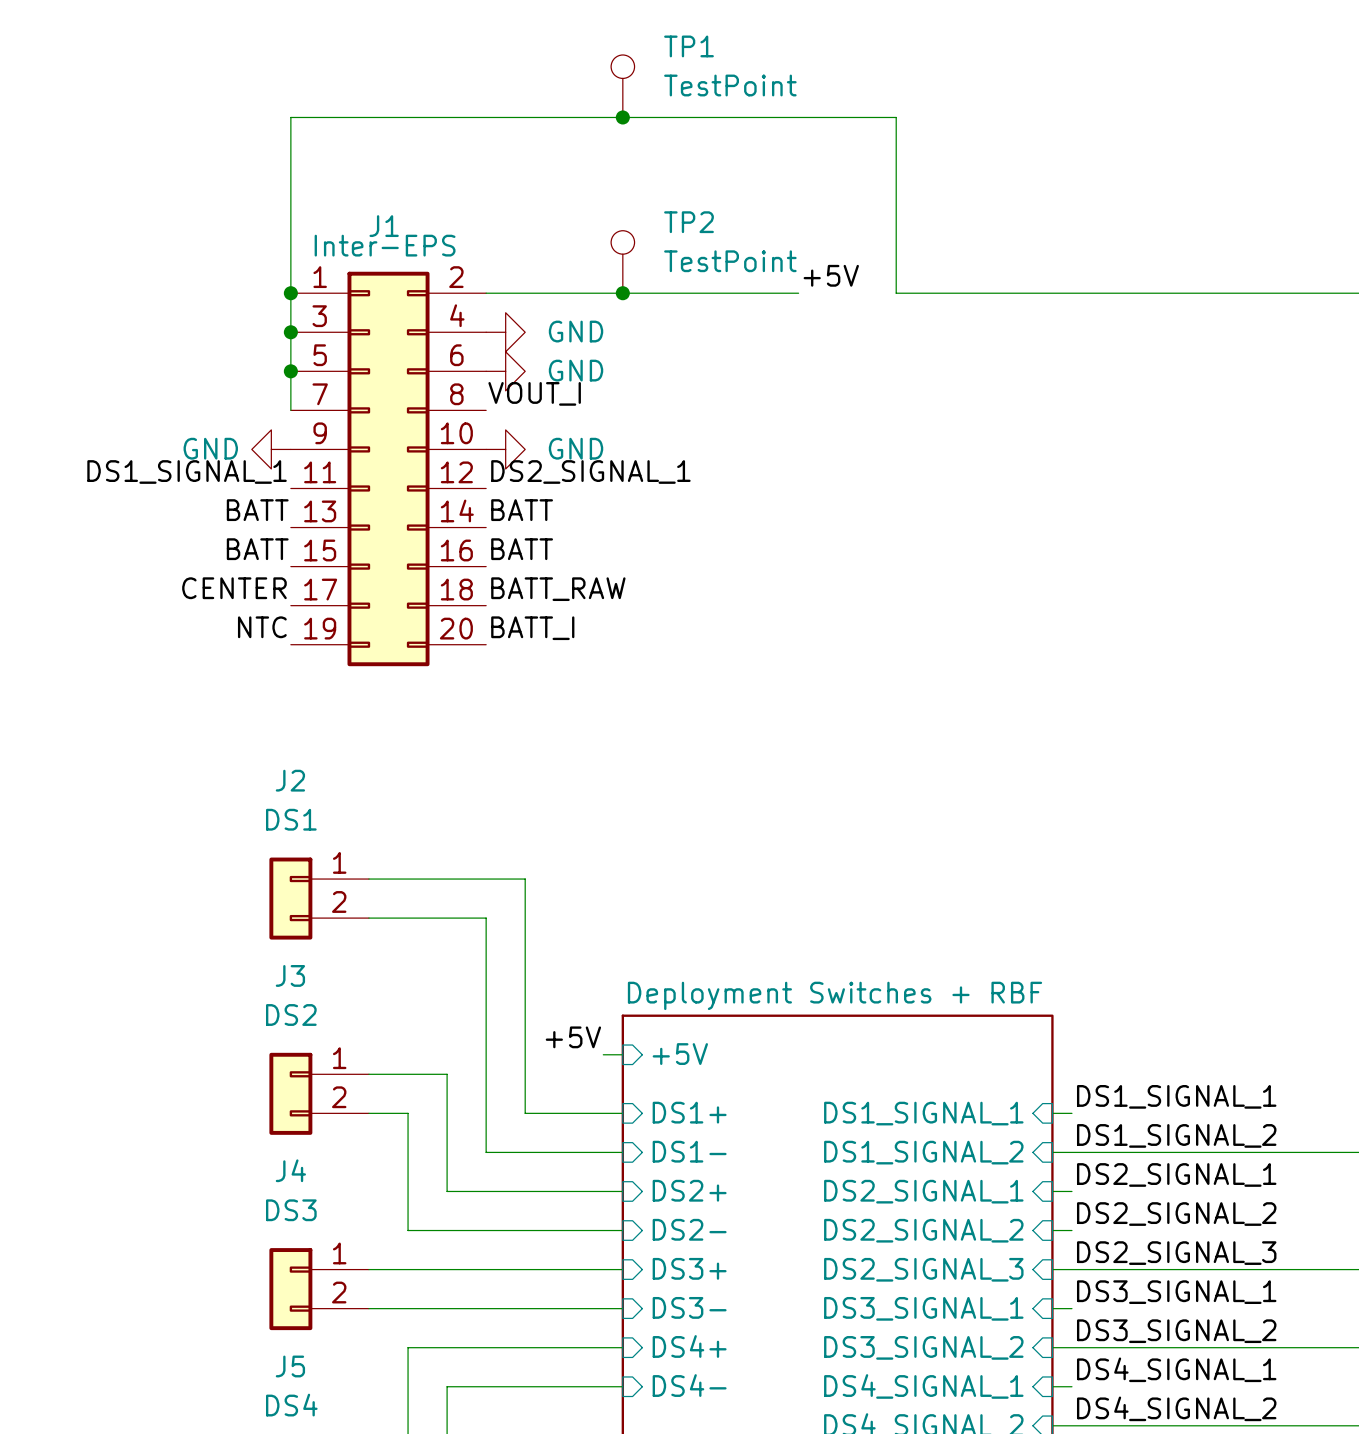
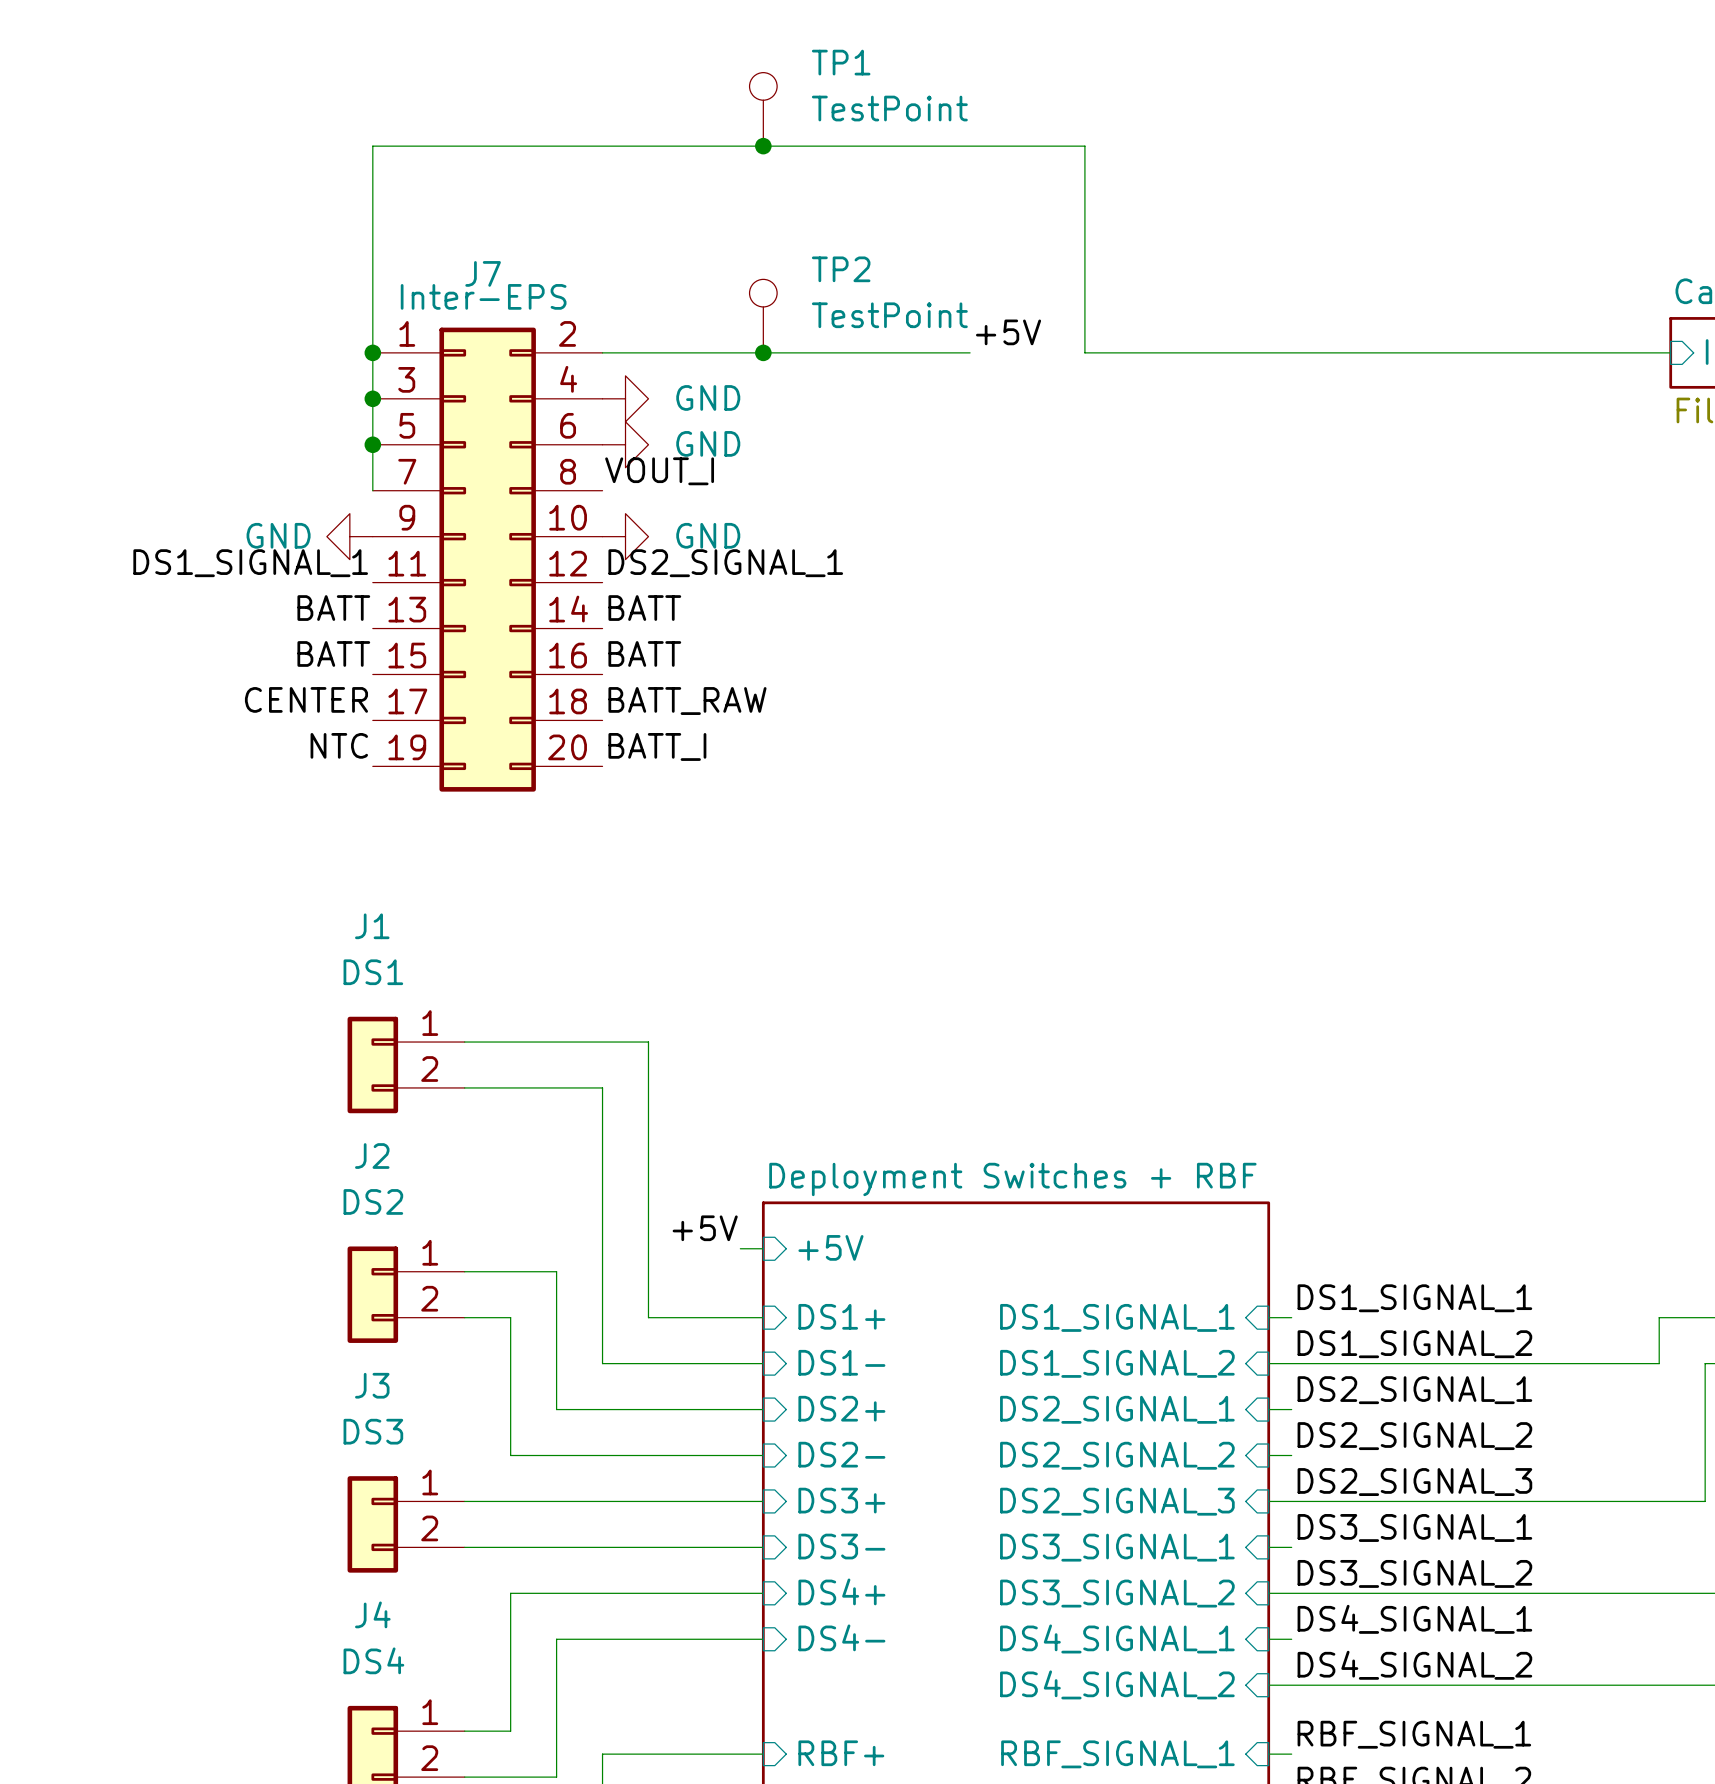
J1 name: J1 (384, 226) -> J7 (483, 273)
J2 name: J2 (290, 780) -> J1 (372, 926)
J3 name: J3 (290, 975) -> J2 (372, 1156)
J4 name: J4 (290, 1170) -> J3 (372, 1385)
J5 name: J5 (290, 1366) -> J4 (372, 1614)

